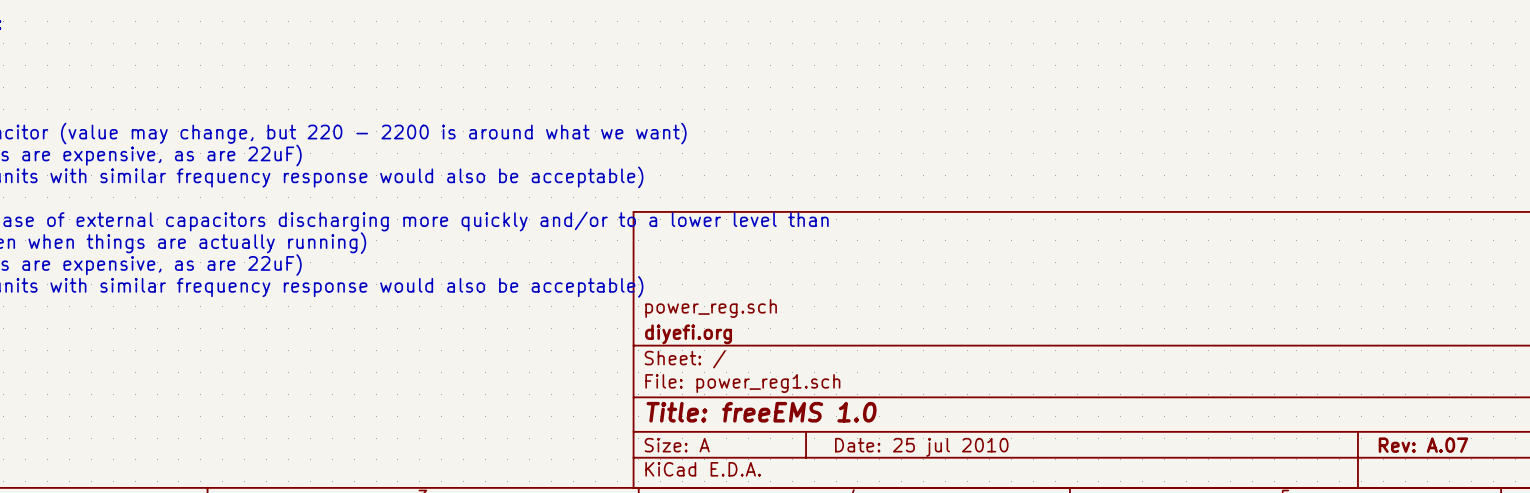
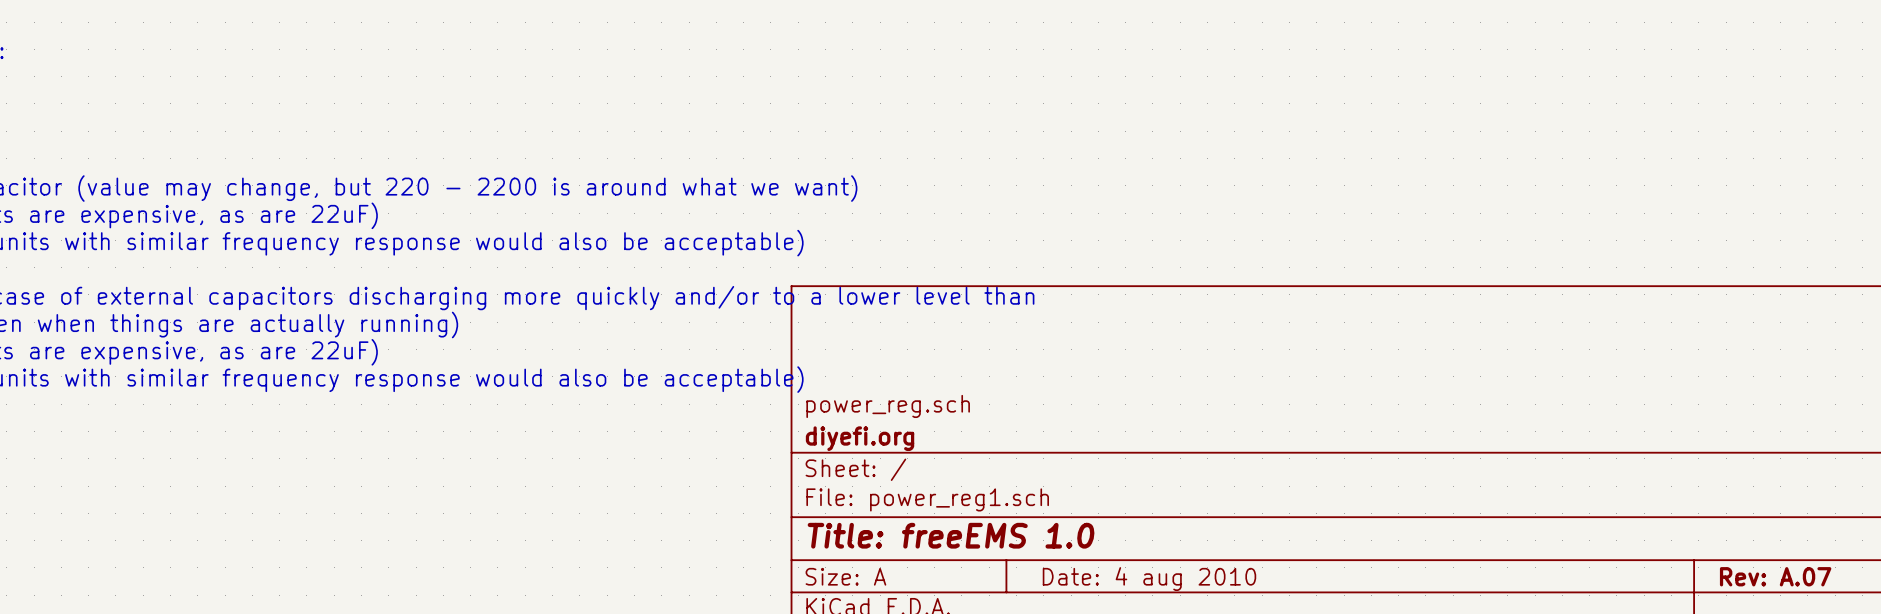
title block: Date: 25 jul 2010 (921, 447) -> Date: 4 aug 2010 (1149, 579)

